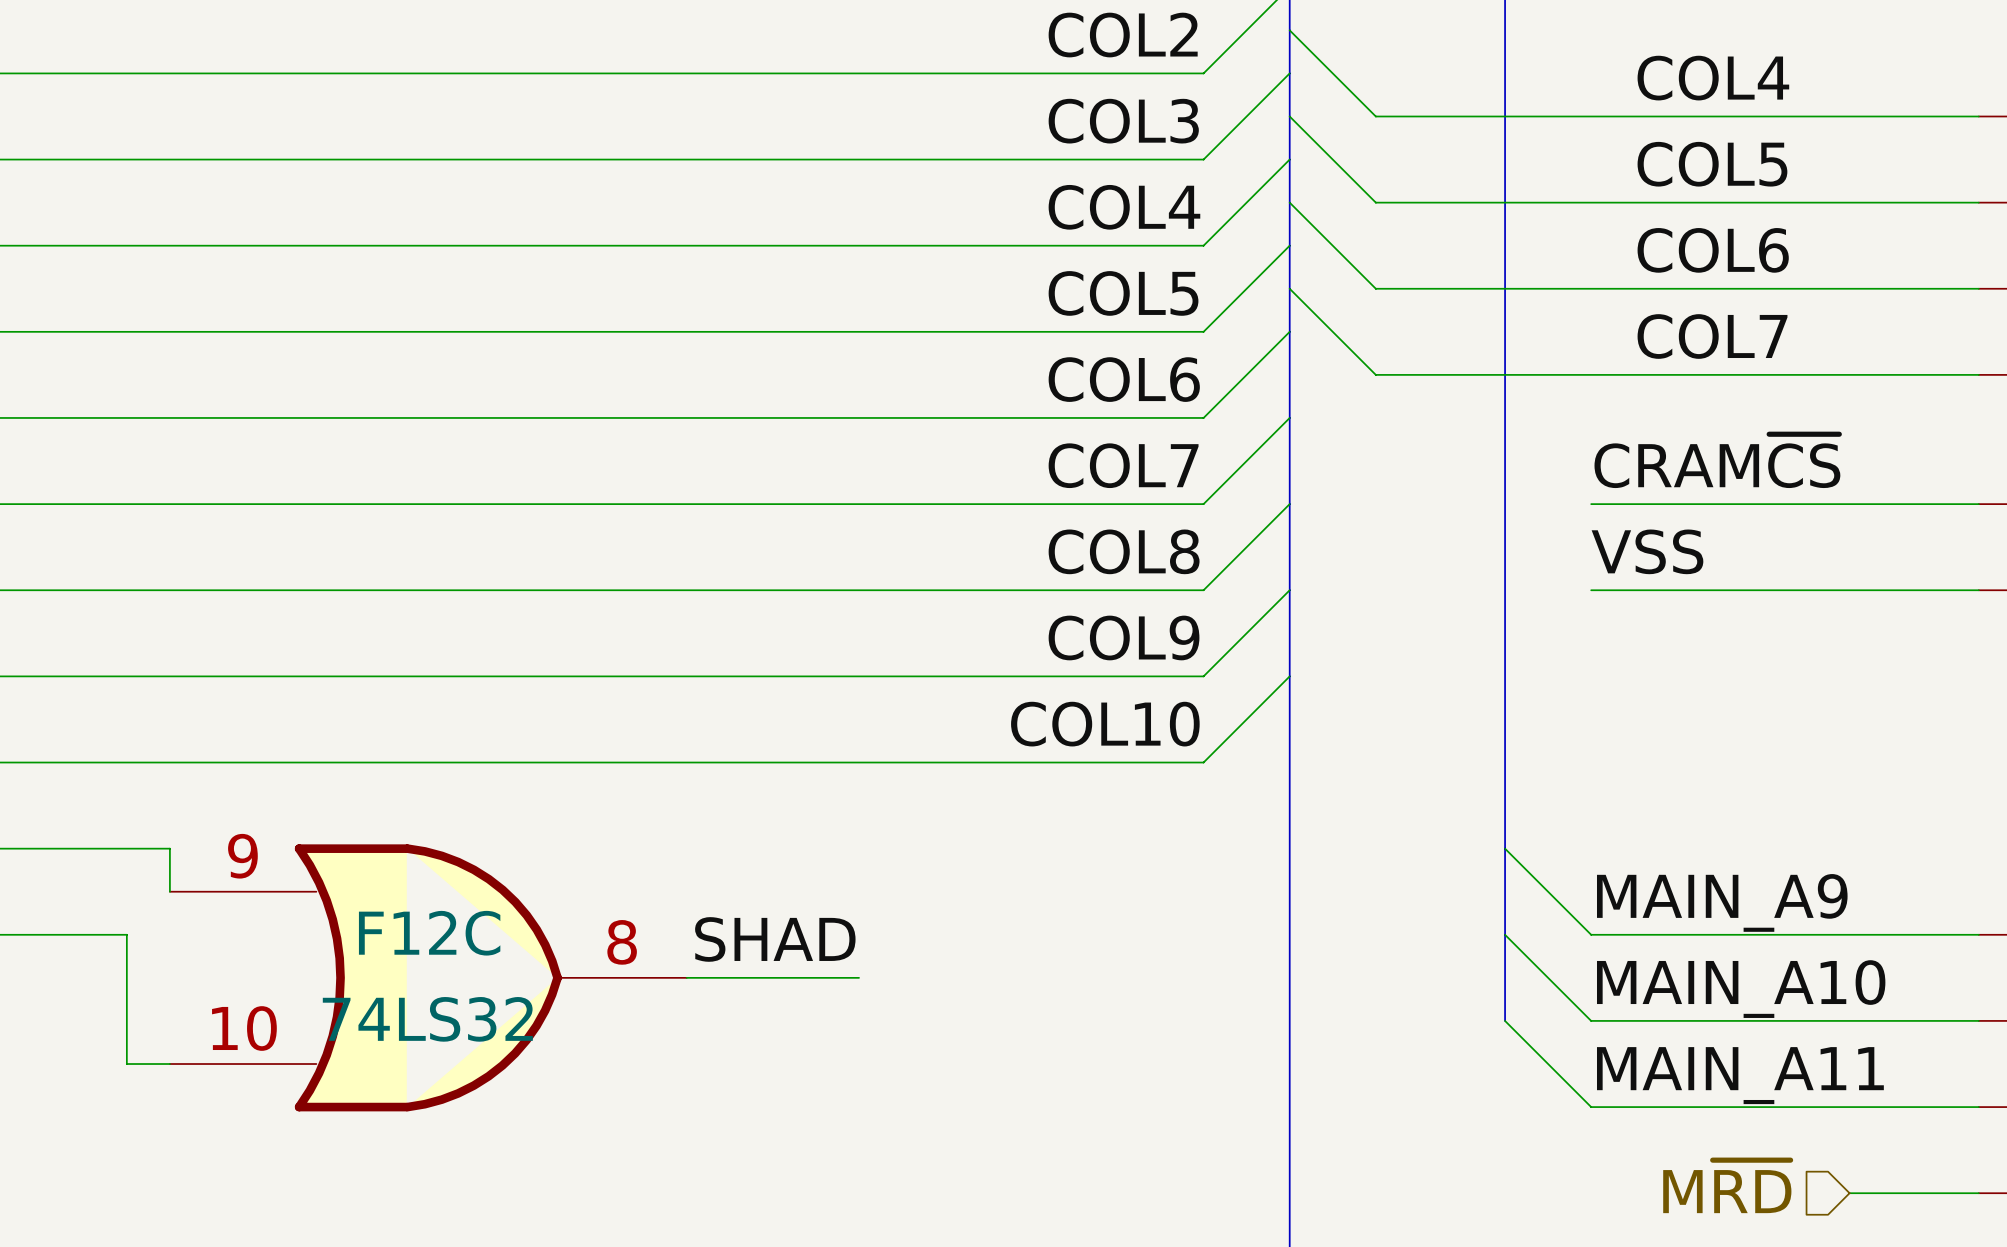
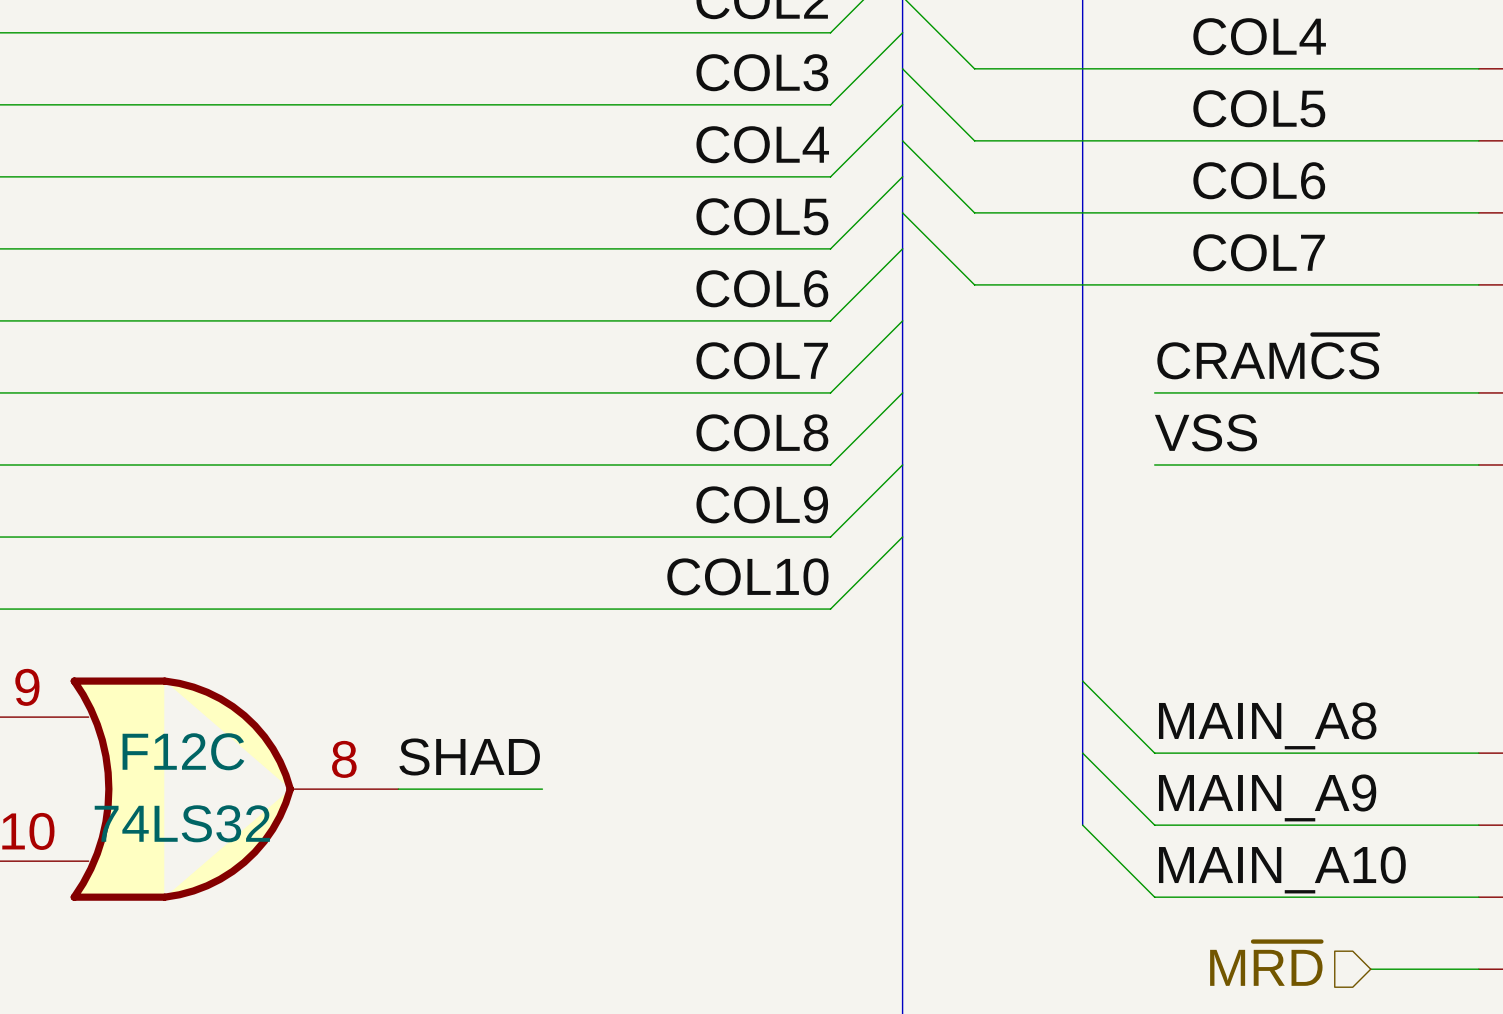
label: MAIN_A9 (1722, 902) -> MAIN_A8 (1267, 725)
label: MAIN_A10 (1741, 989) -> MAIN_A9 (1267, 797)
label: MAIN_A11 (1740, 1075) -> MAIN_A10 (1282, 869)

